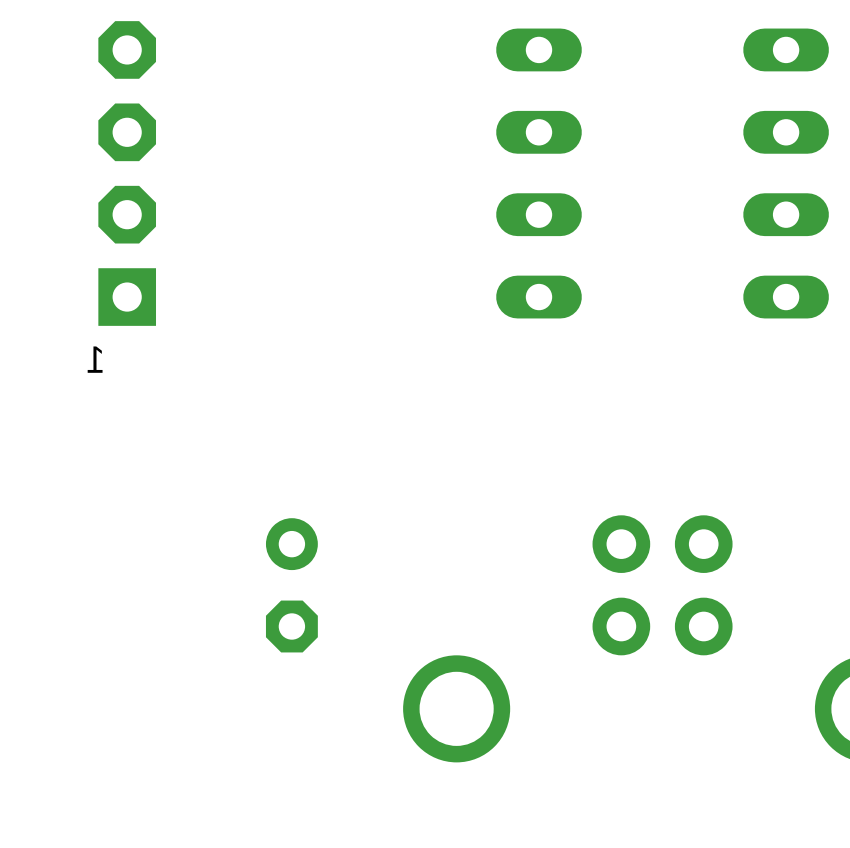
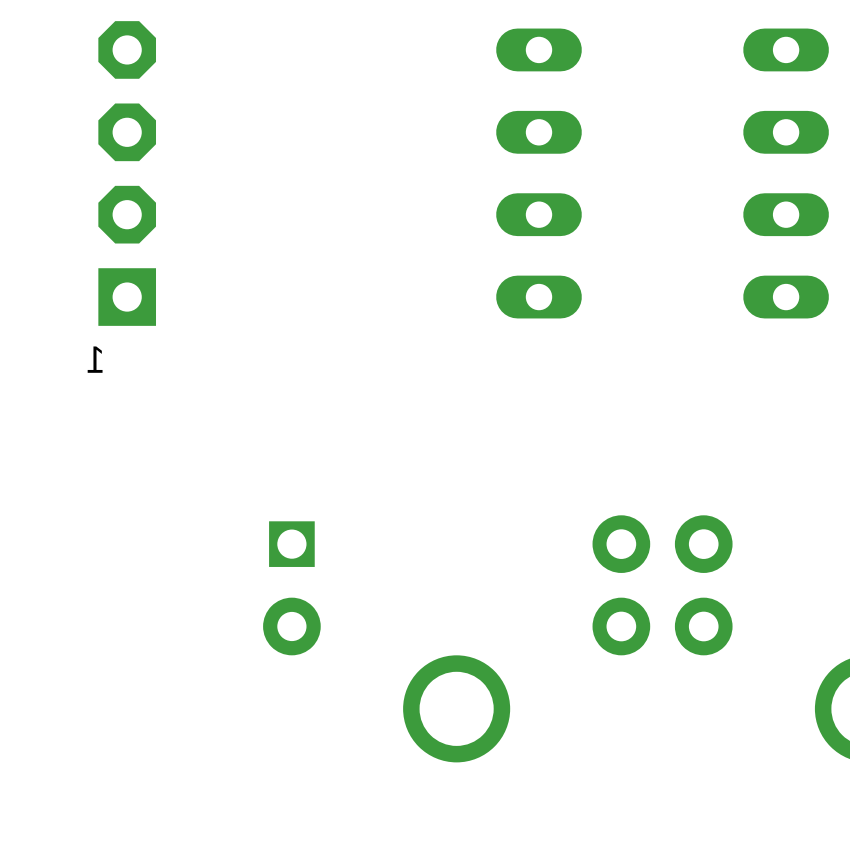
part footprint: [265, 518, 318, 653] -> [263, 521, 321, 656]

